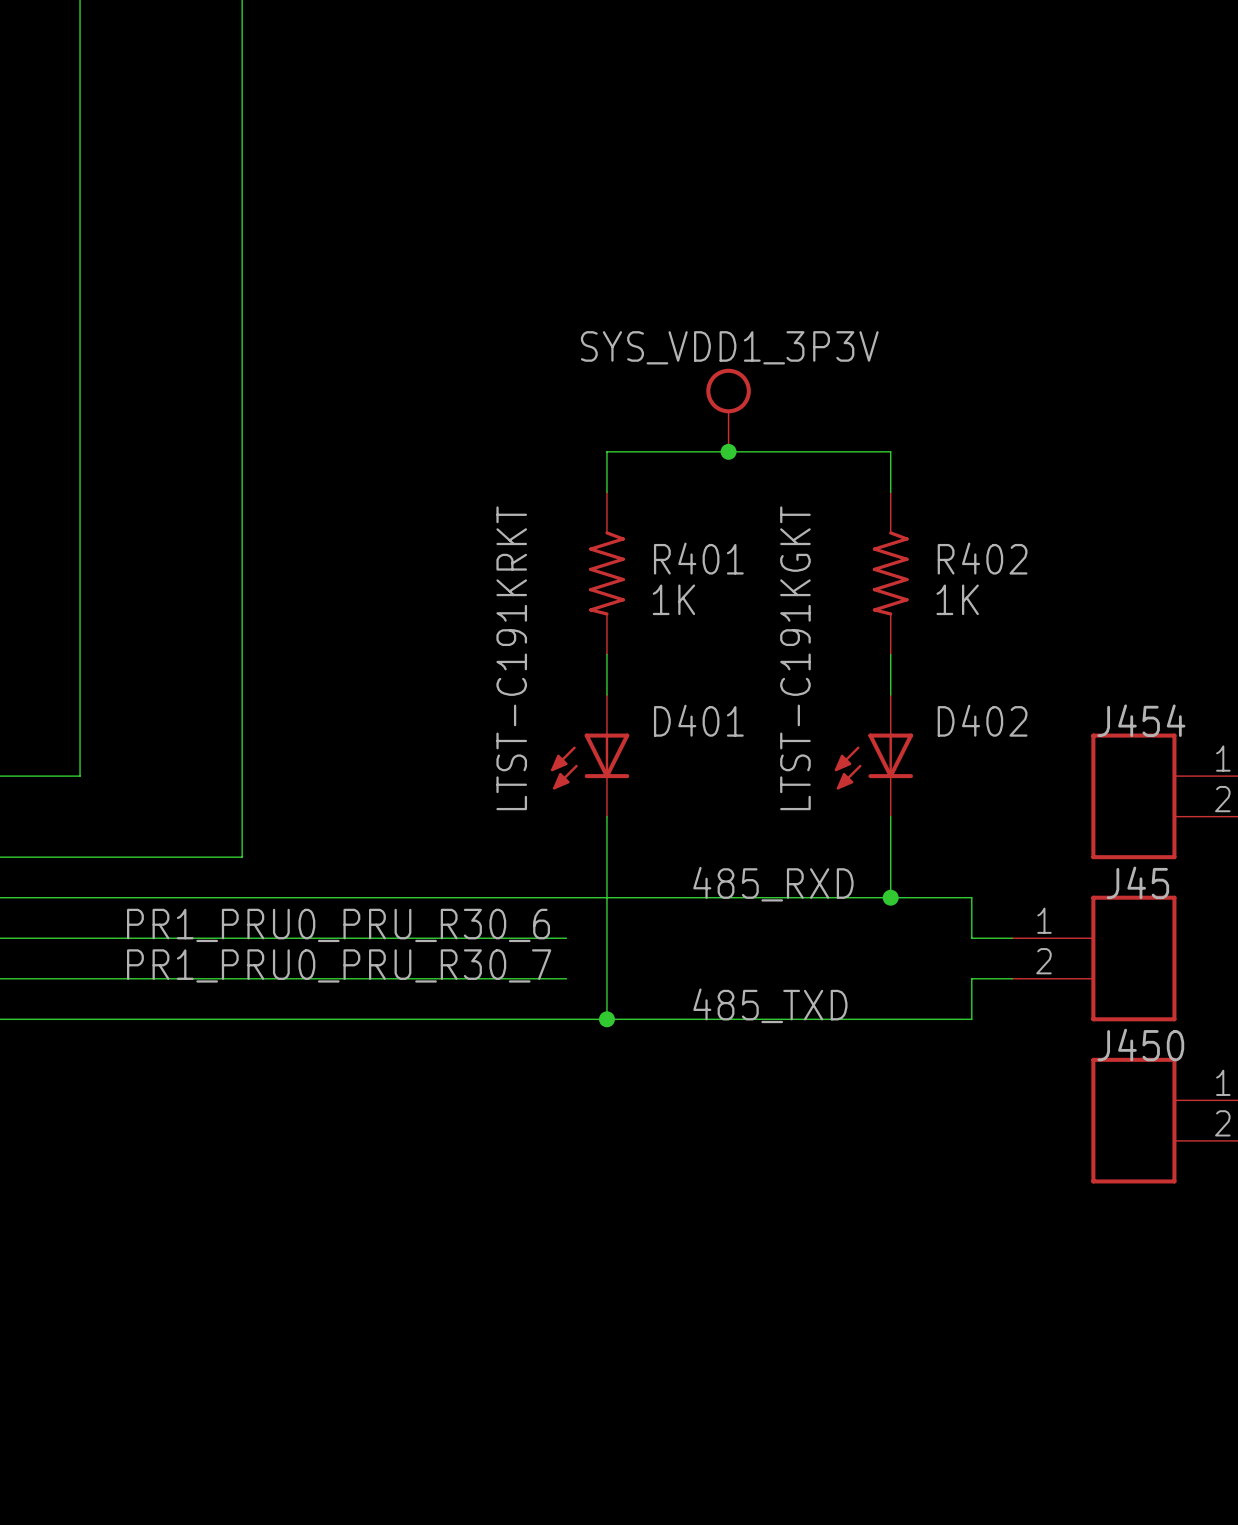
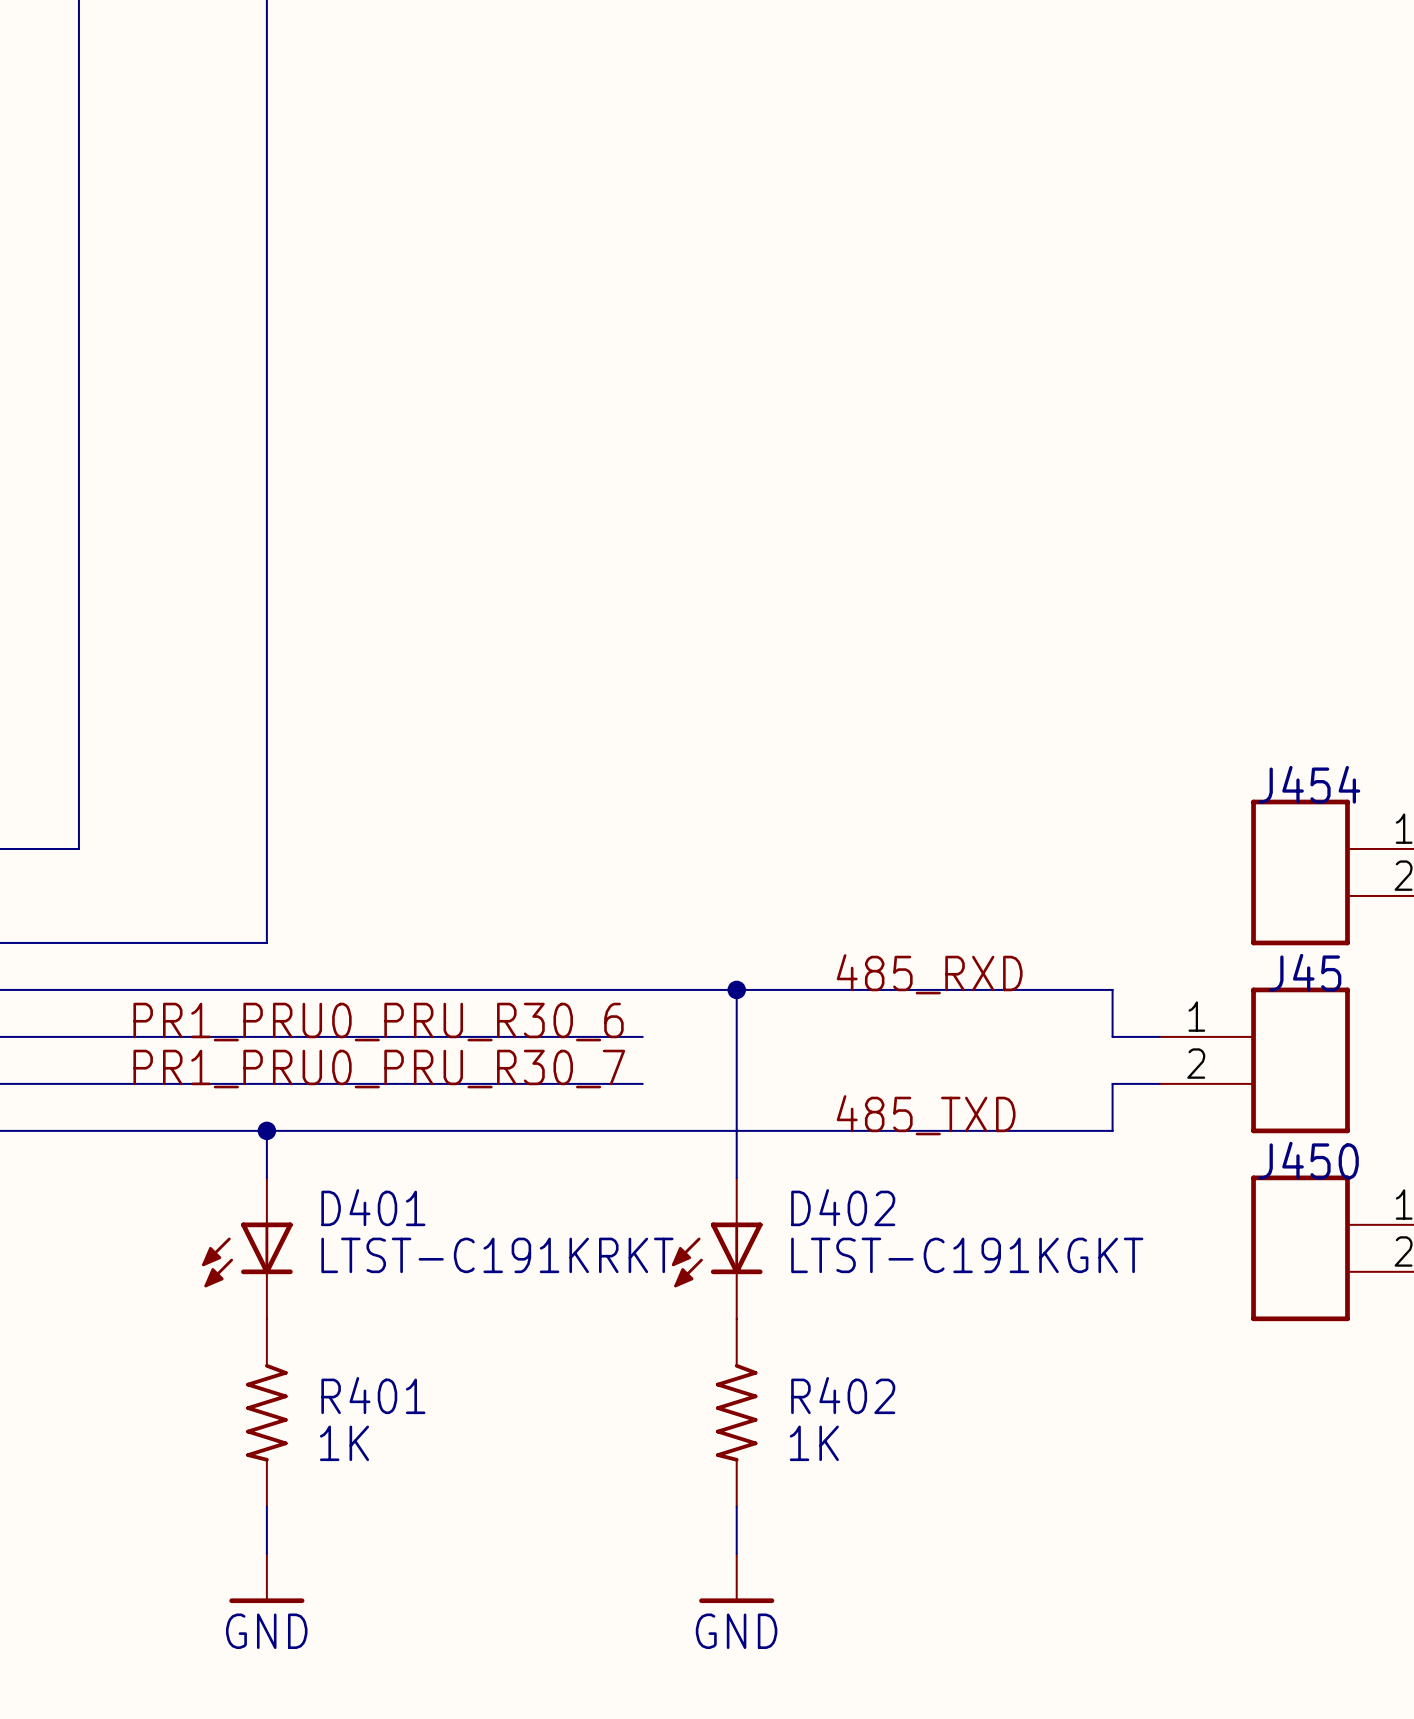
power symbol: SYS_VDD1_3P3V (728, 410) -> none
junction: (728, 451) -> none
wire: (606, 492) (606, 451) (890, 451) (890, 492) -> none
R401 position: (606, 573) -> (266, 1412)
R402 position: (890, 573) -> (736, 1412)
wire: (606, 654) (606, 695) -> none
wire: (890, 654) (890, 695) -> none
D401 value rotation: 0° (511, 658) -> 90° clockwise (497, 1255)
D402 value rotation: 0° (795, 658) -> 90° clockwise (967, 1255)
D401 position: (590, 755) -> (247, 1248)
D402 position: (873, 755) -> (717, 1248)
wire: (606, 816) (606, 1019) -> none
wire: (890, 816) (890, 897) -> none
label position: 485_RXD (773, 884) -> 485_RXD (929, 974)
wire: none -> (736, 989) (736, 1177)
junction: none -> (736, 989)
junction: (890, 897) -> none
label position: 485_TXD (770, 1005) -> 485_TXD (926, 1115)
wire: none -> (266, 1130) (266, 1177)
junction: none -> (266, 1130)
junction: (606, 1019) -> none
wire: none -> (266, 1506) (266, 1553)
wire: none -> (736, 1506) (736, 1553)
power symbol: none -> GND (266, 1578)
power symbol: none -> GND (736, 1578)

